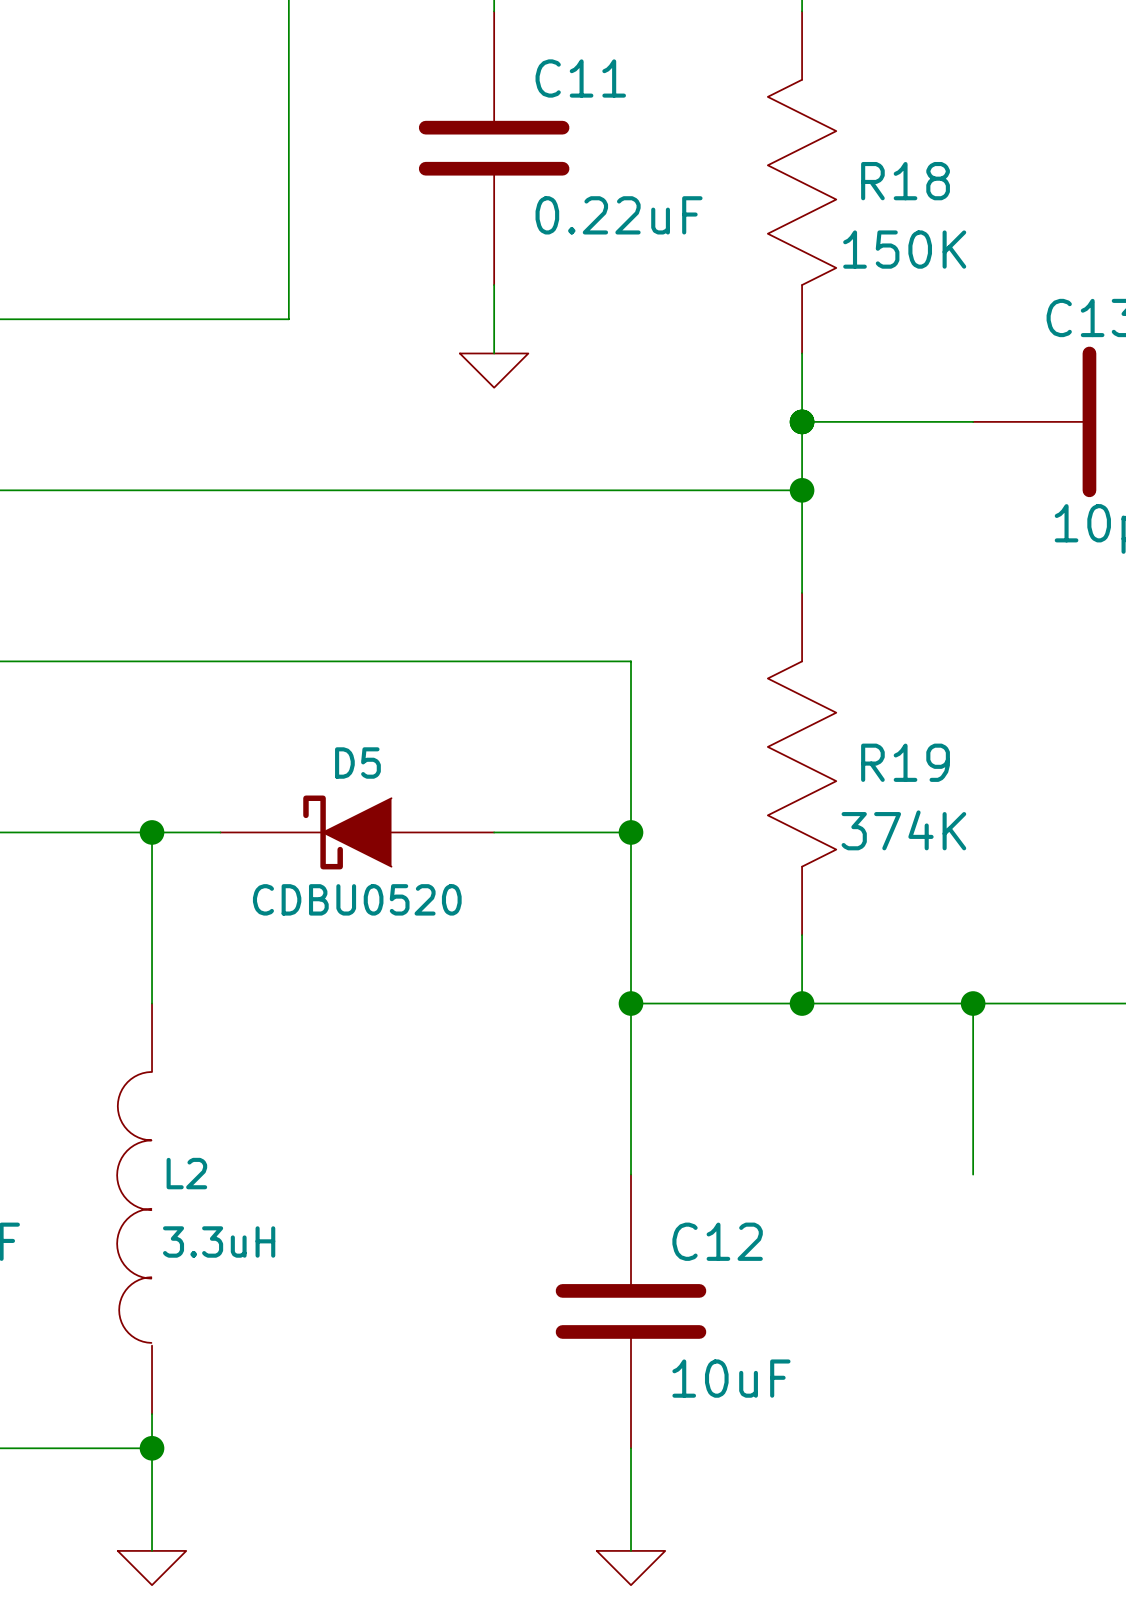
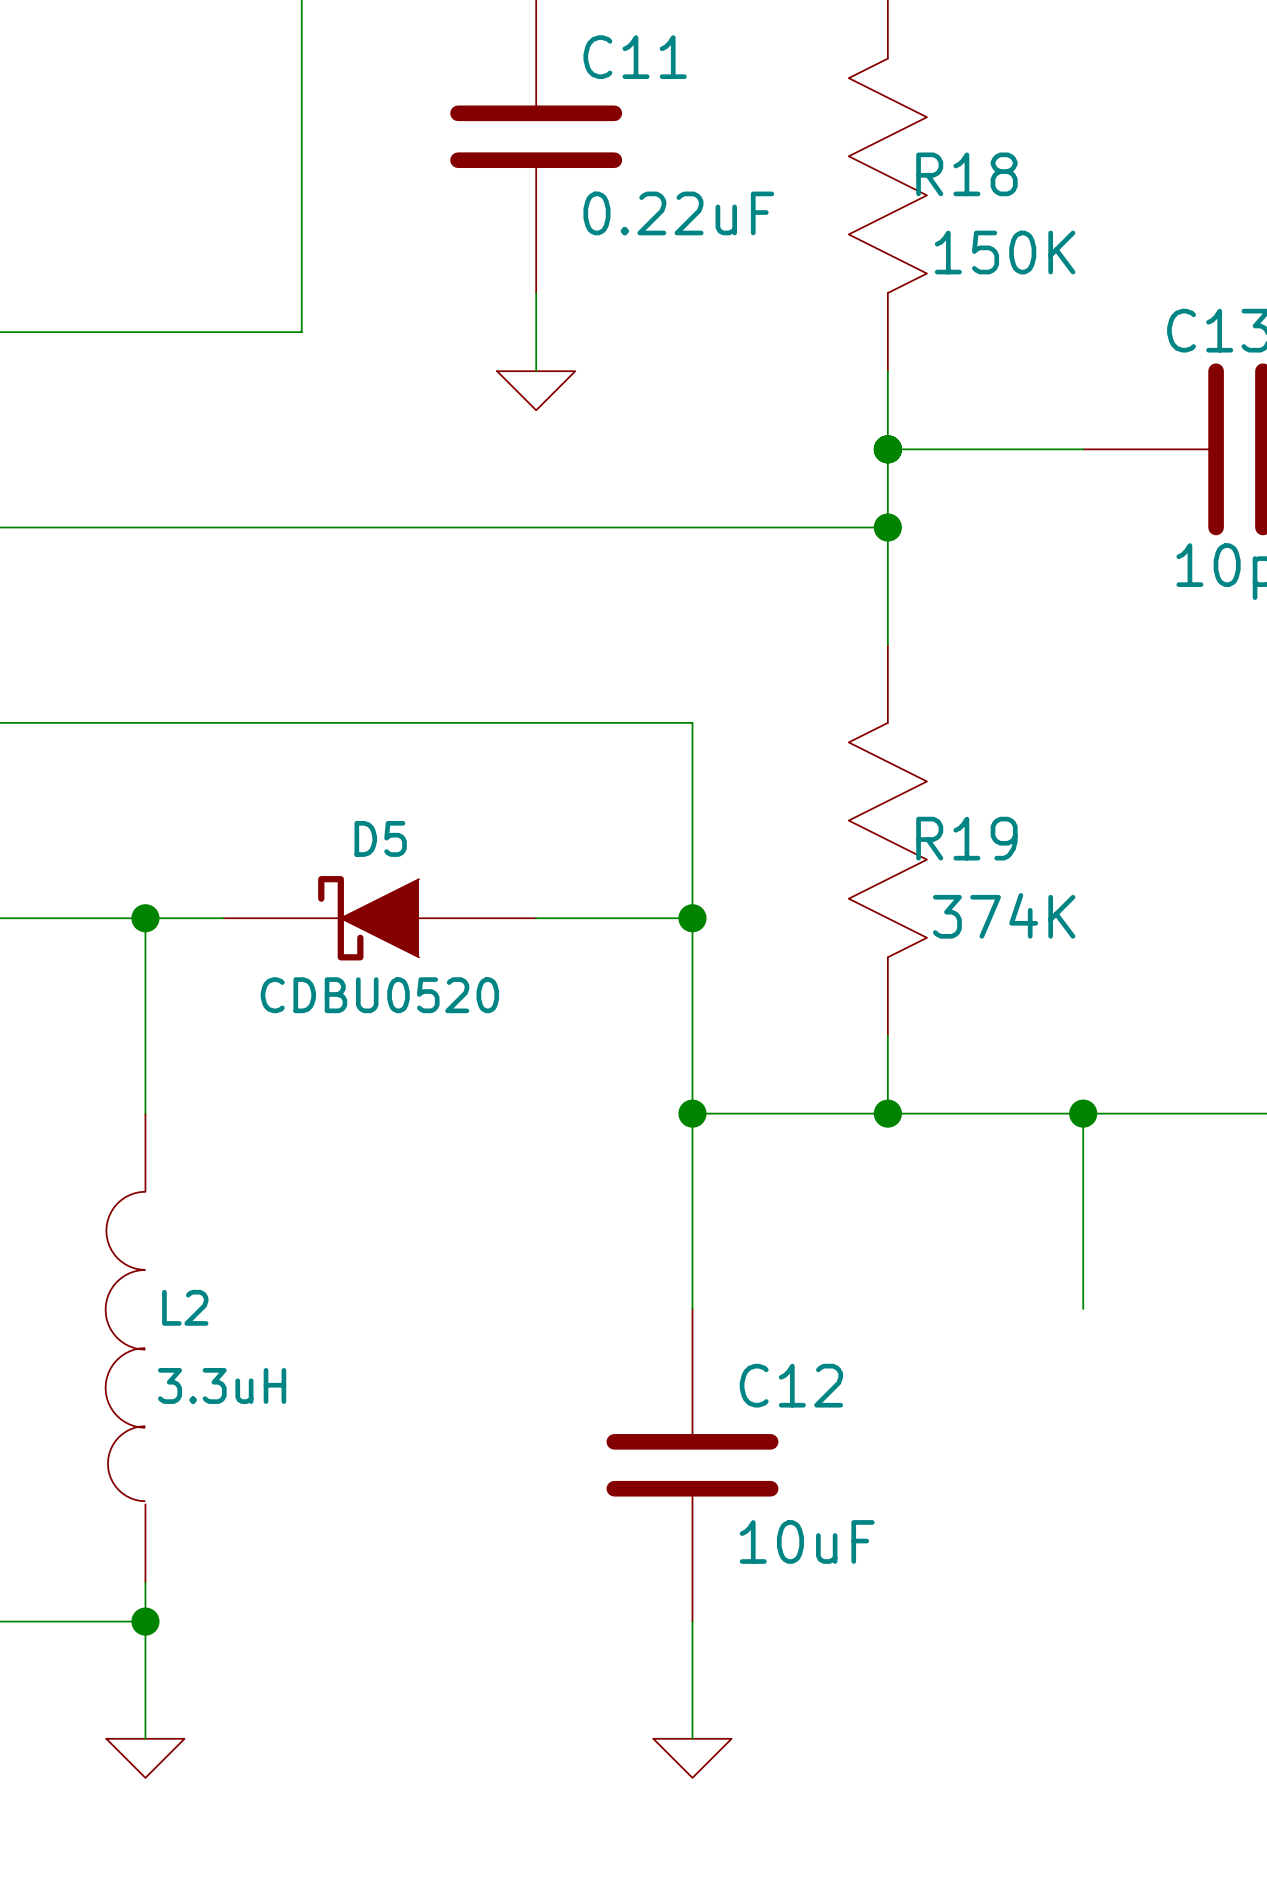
R18 name position: R18 (905, 181) -> R18 (966, 174)
R19 name position: R19 (905, 762) -> R19 (966, 838)

